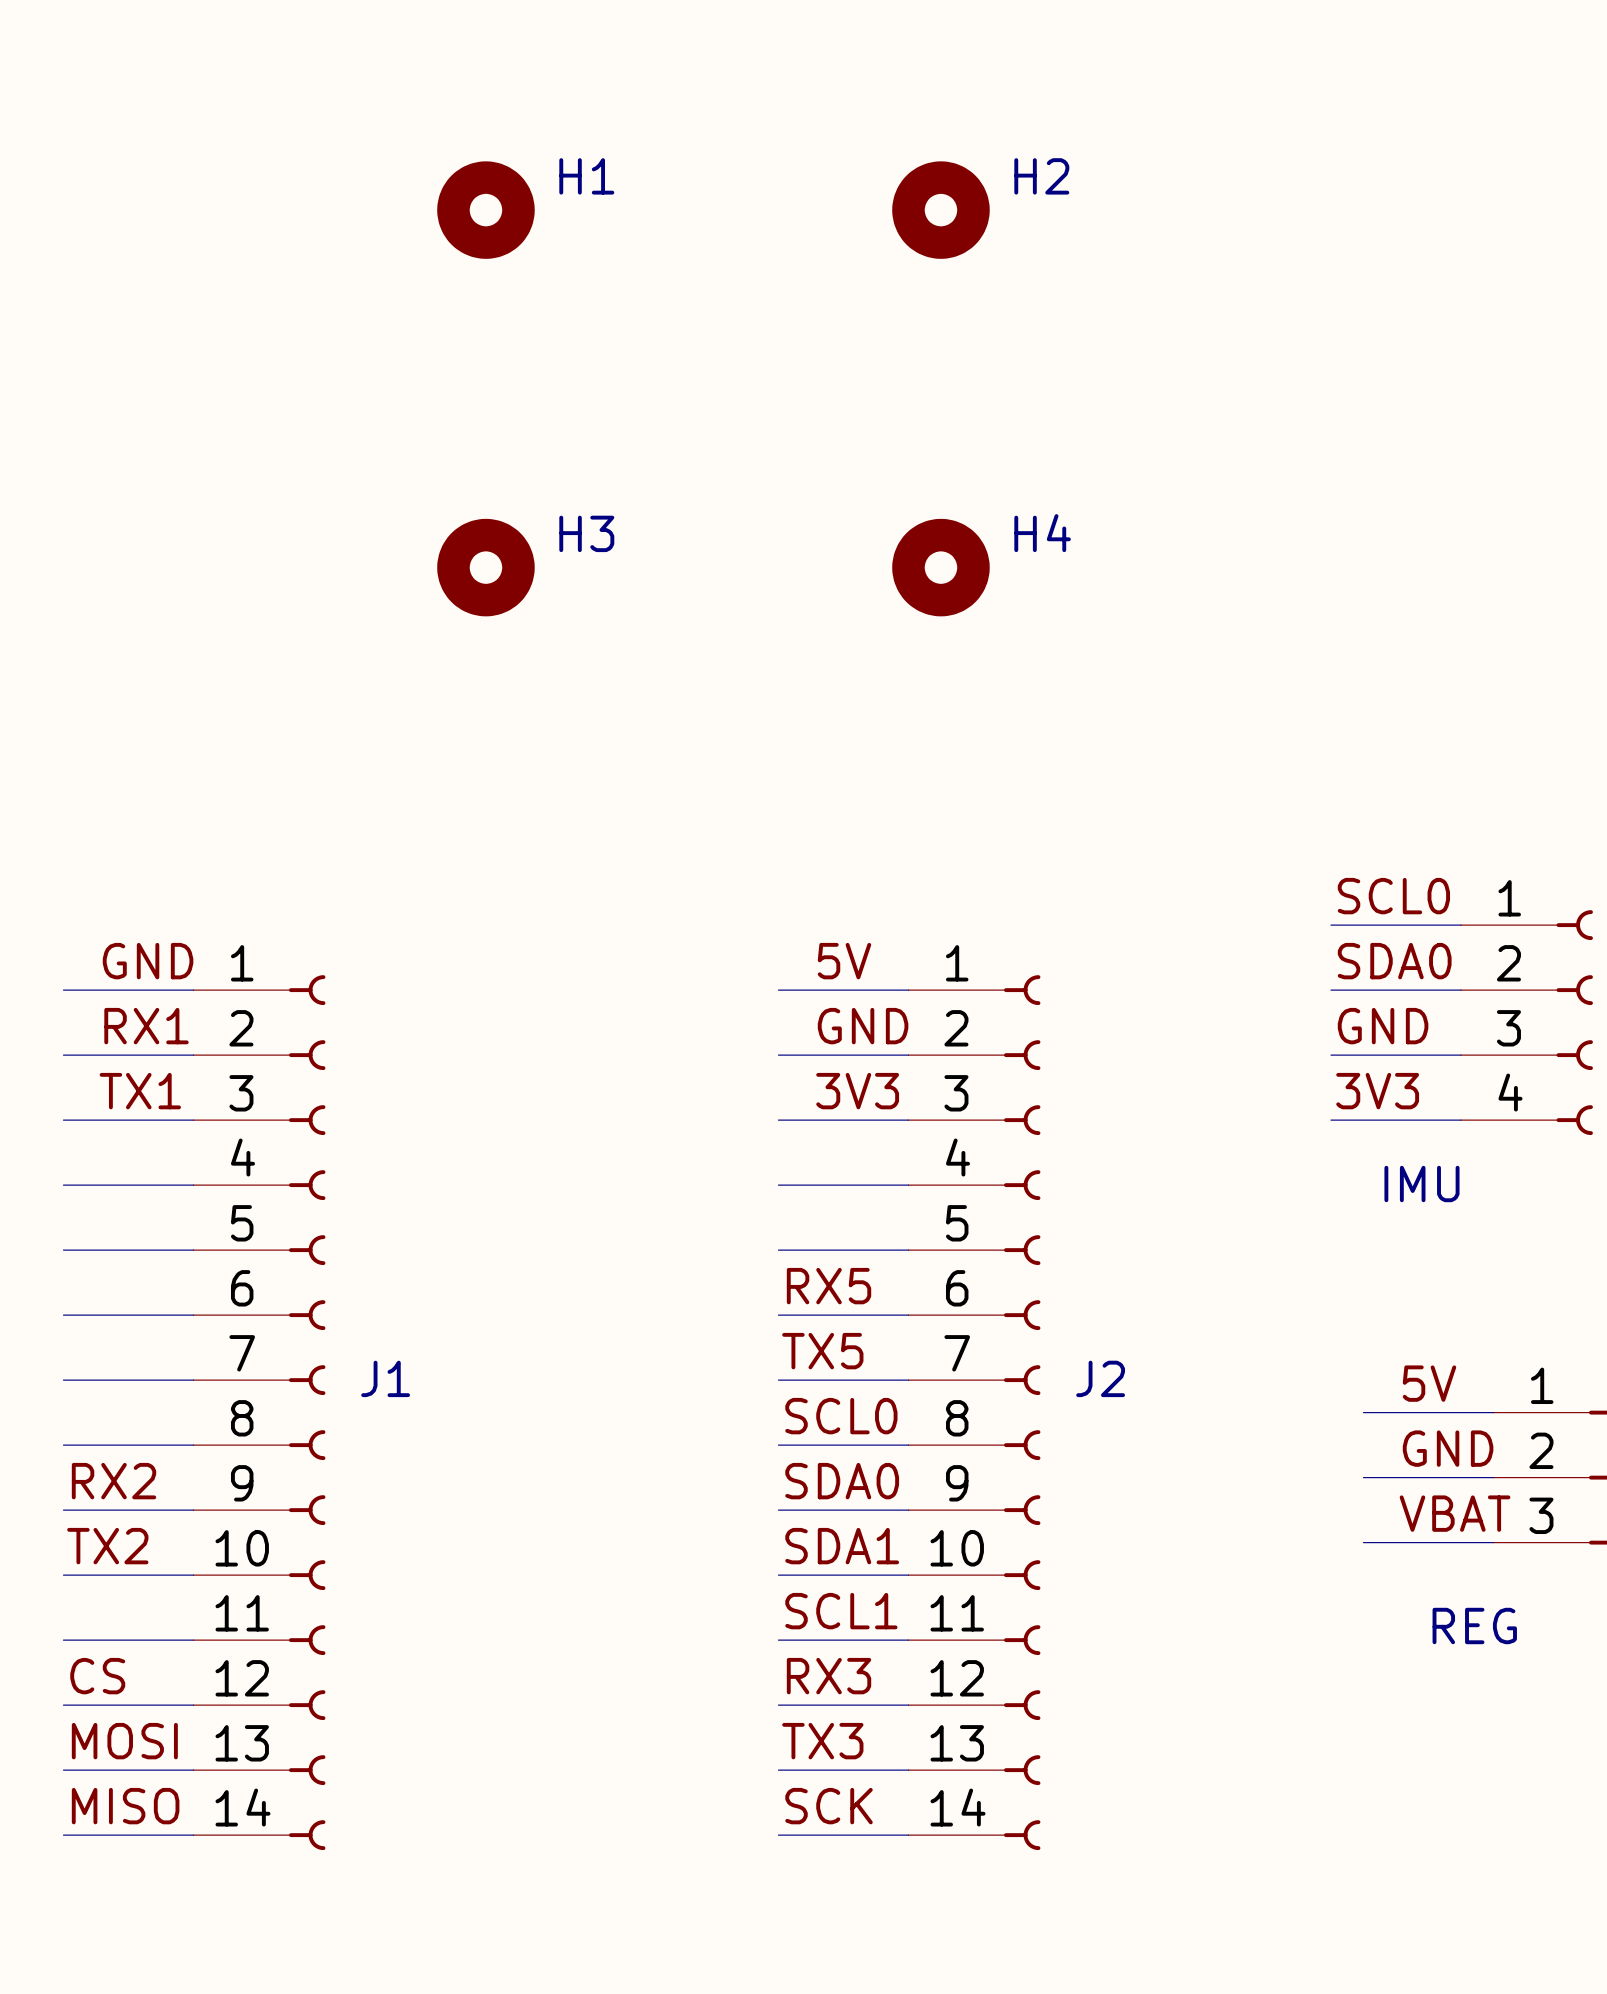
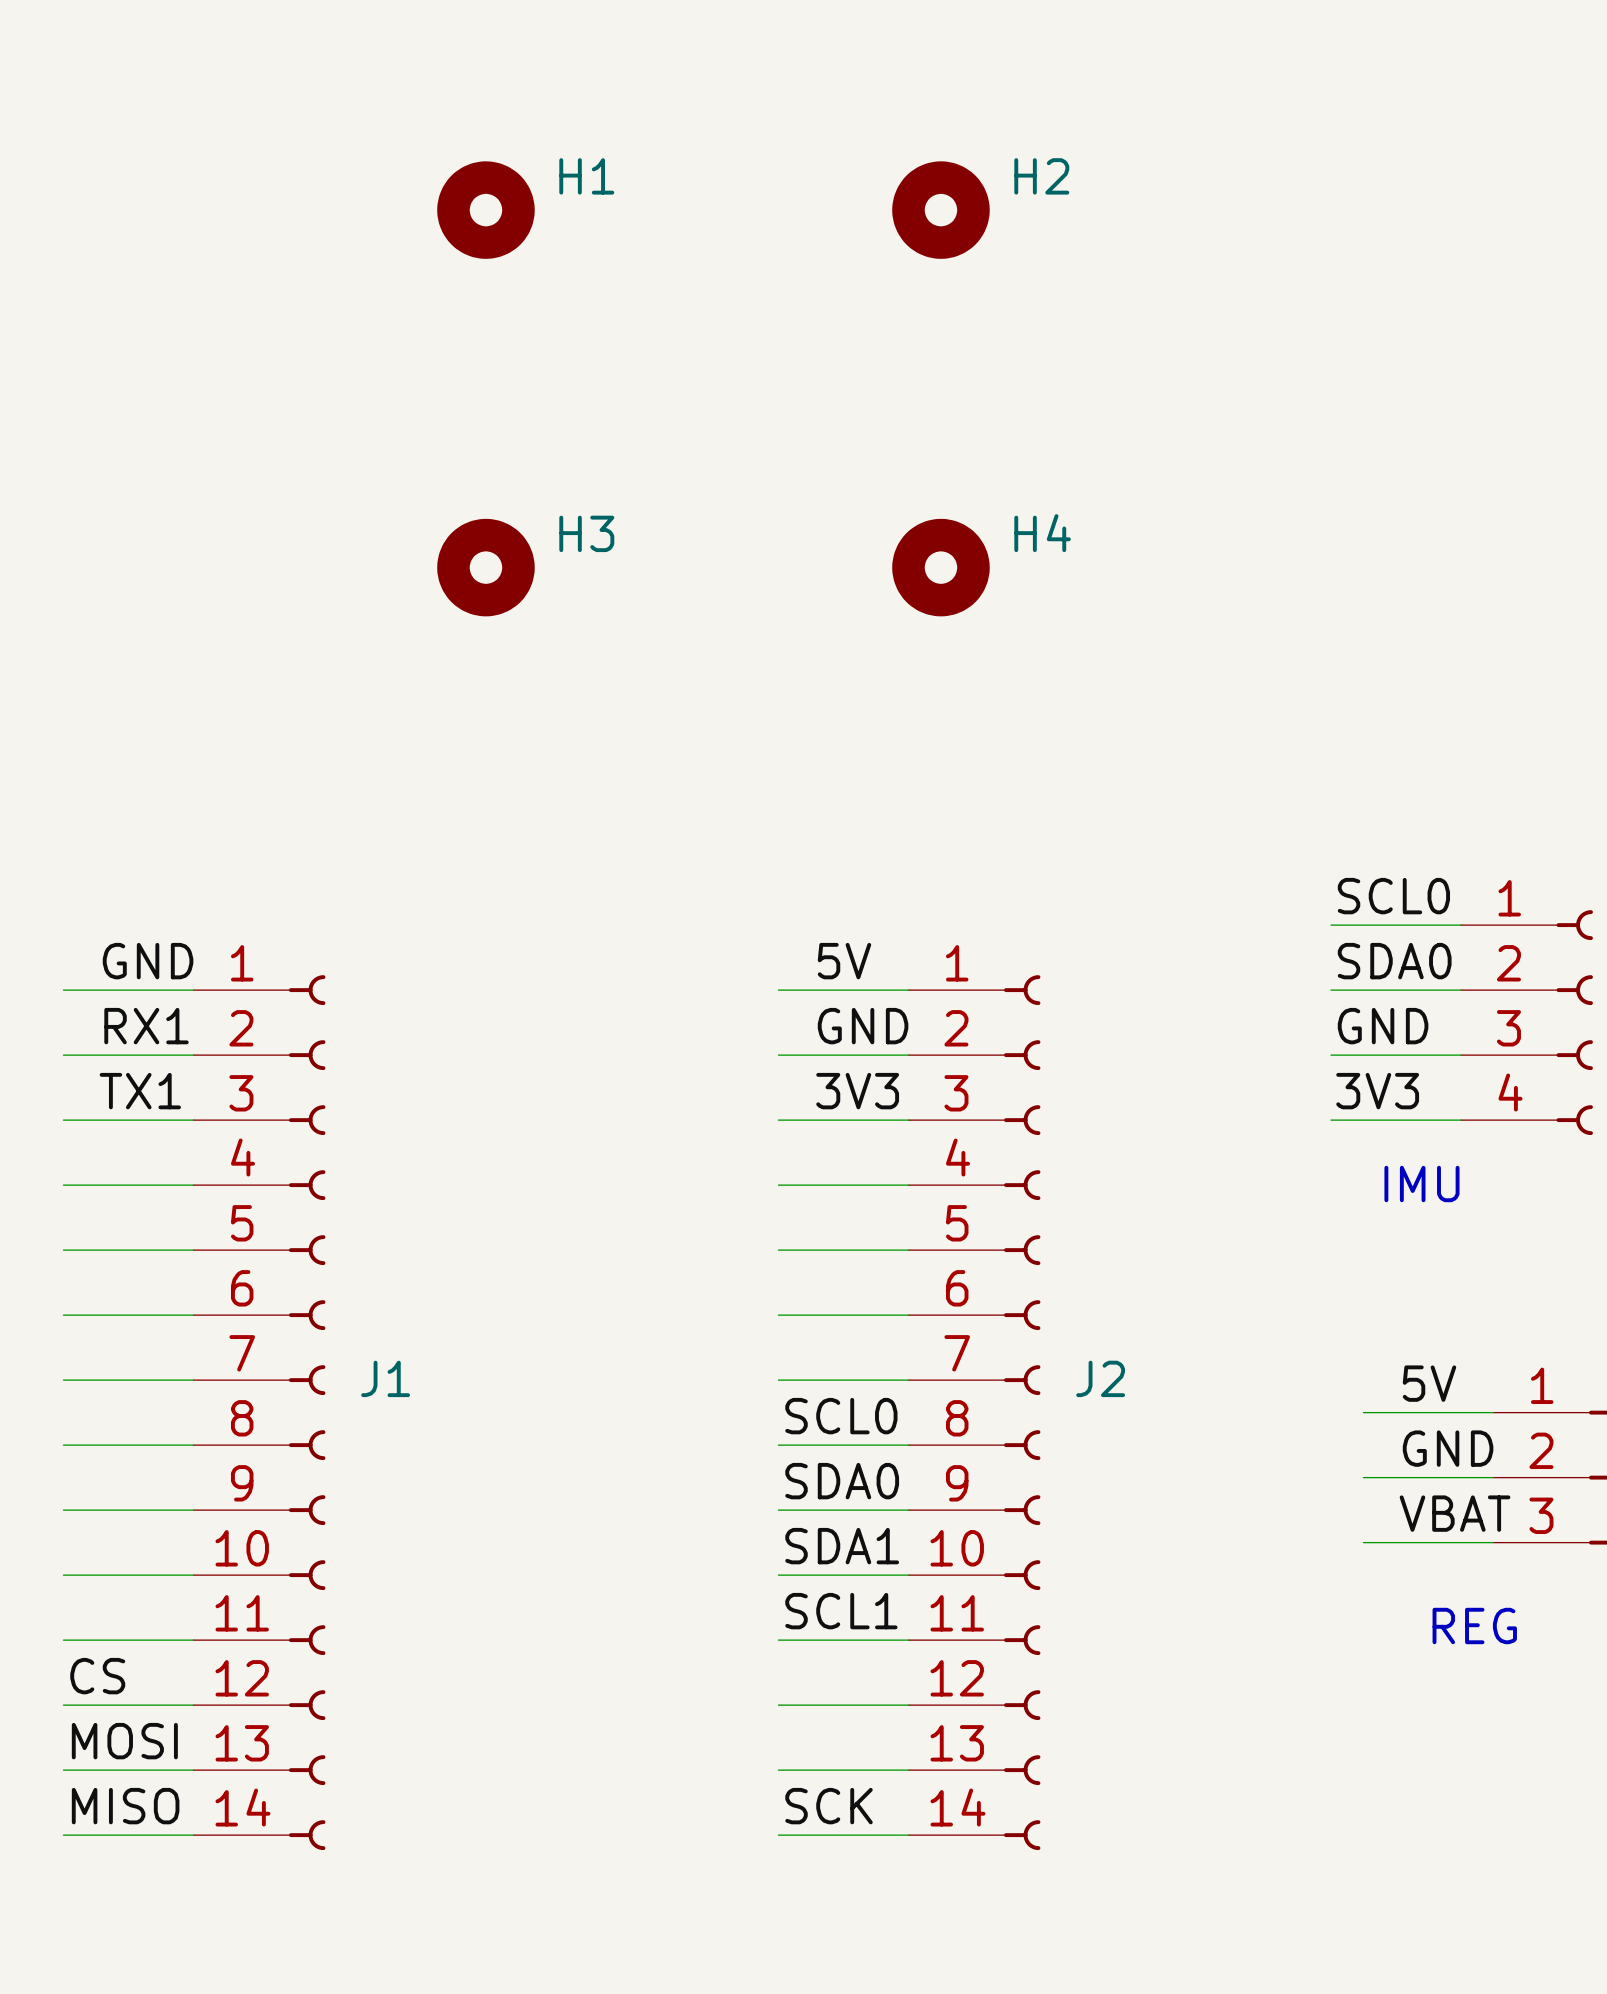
label: RX5 (829, 1286) -> none
label: TX5 (822, 1351) -> none
label: RX2 (114, 1481) -> none
label: TX2 (107, 1546) -> none
label: RX3 (829, 1676) -> none
label: TX3 (822, 1741) -> none

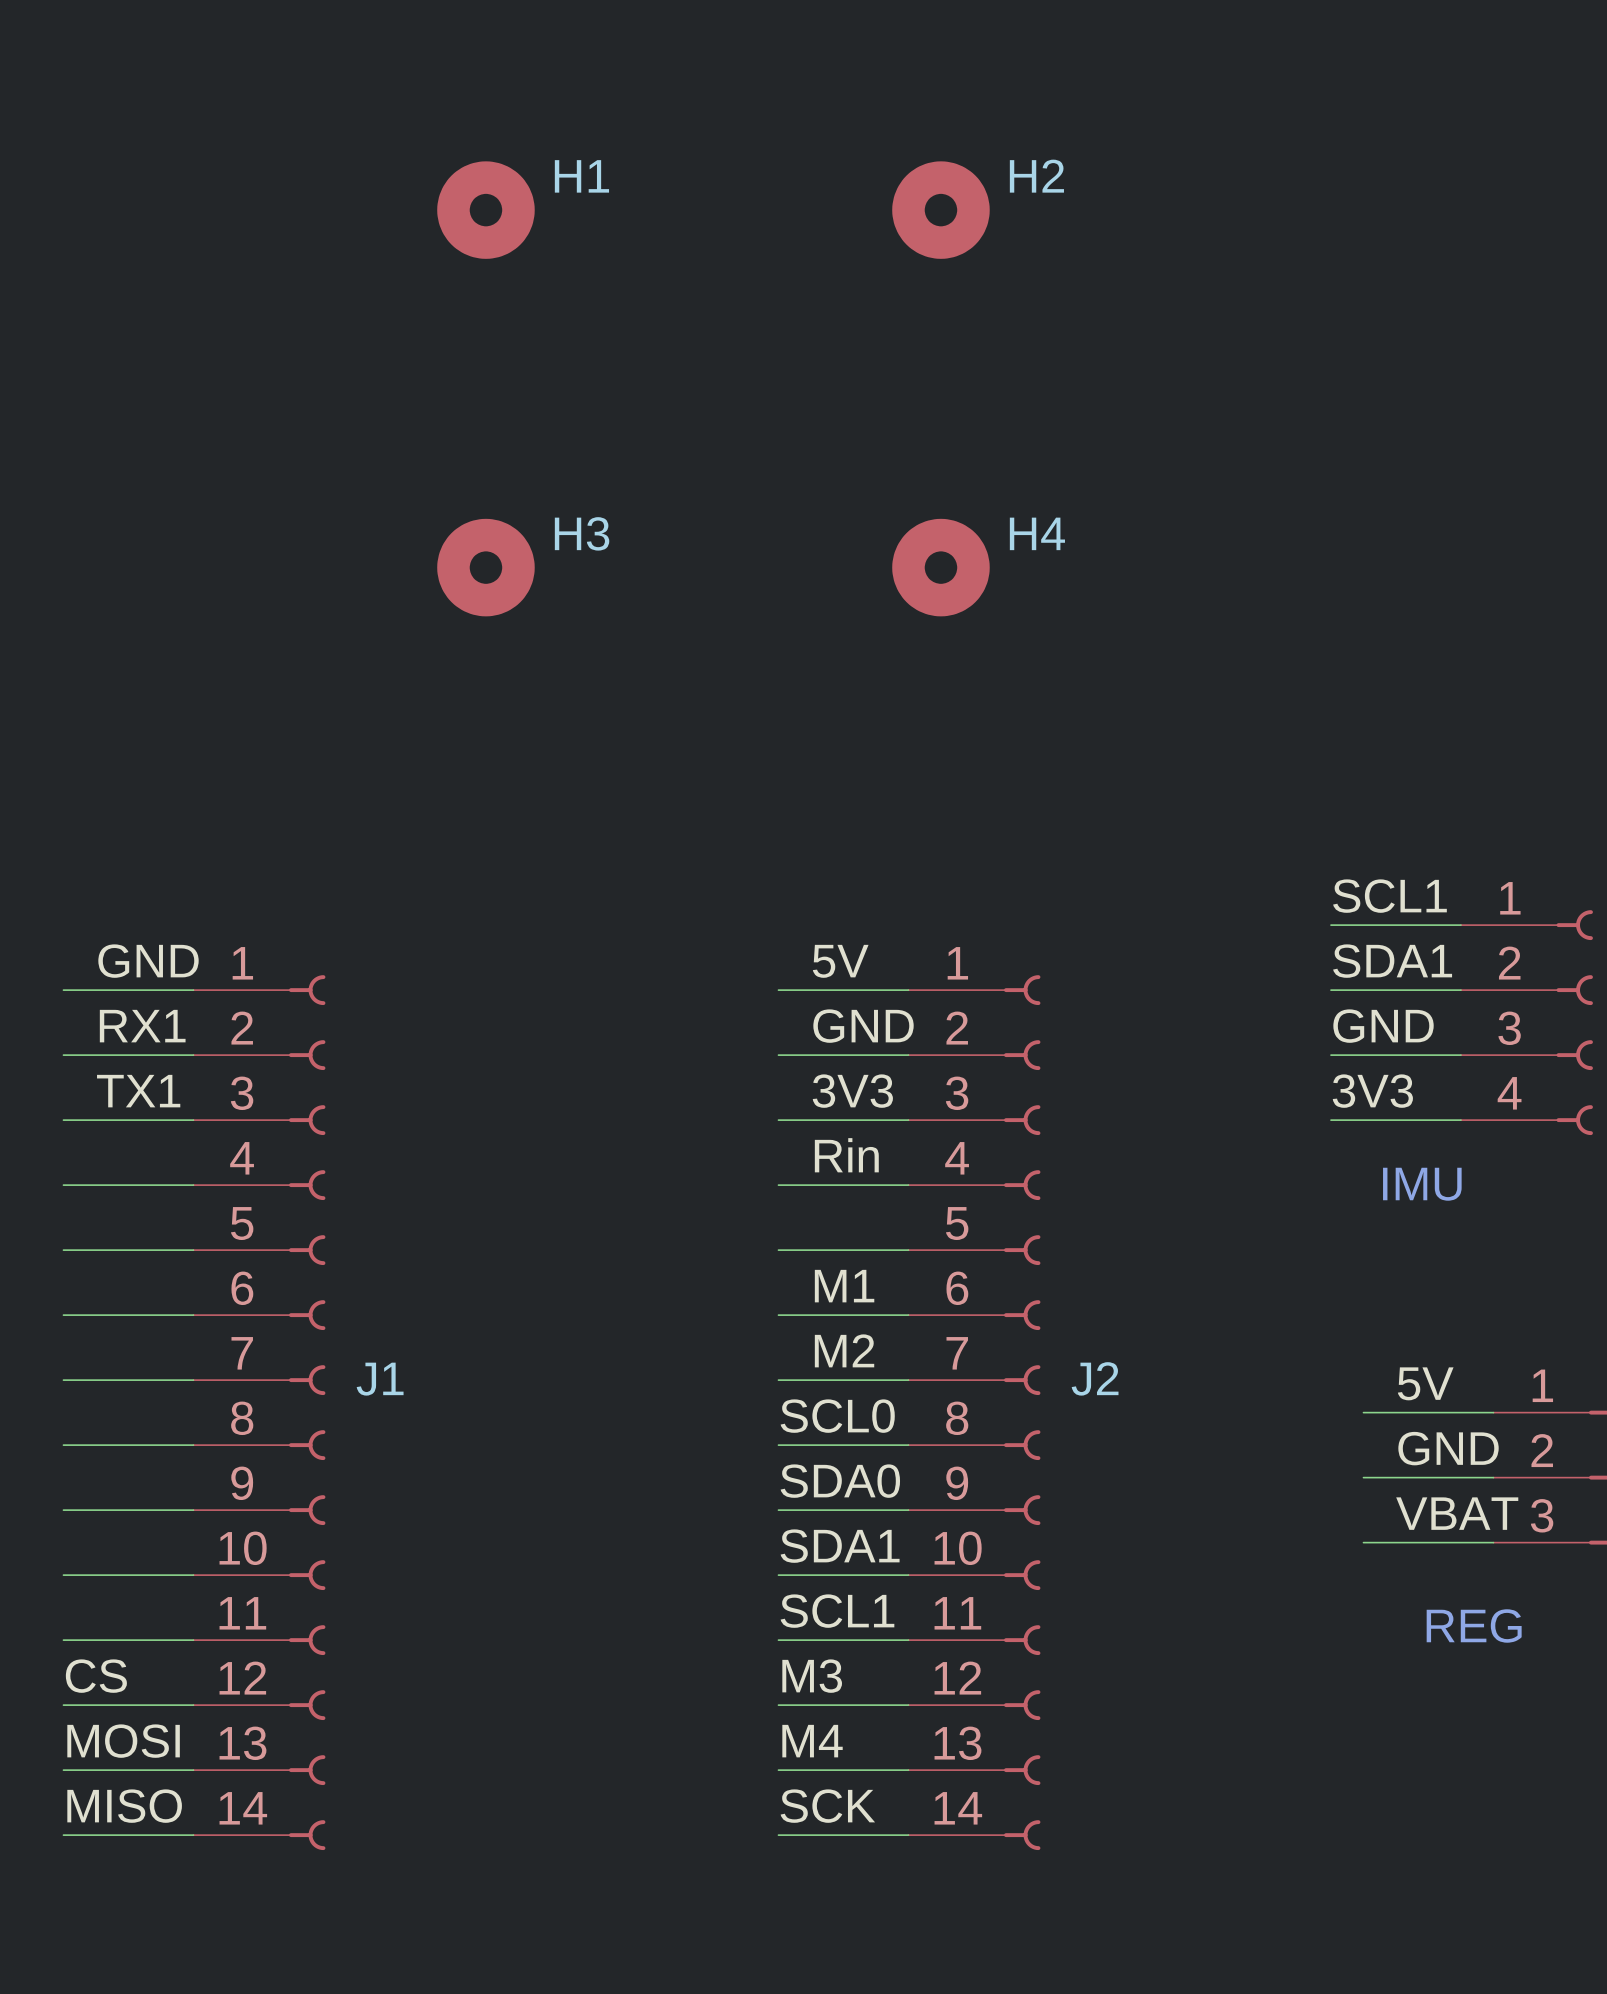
label: SCL0 (1393, 896) -> SCL1 (1389, 896)
label: SDA0 (1394, 961) -> SDA1 (1392, 961)
label: none -> Rin (846, 1155)
label: none -> M1 (844, 1286)
label: none -> M2 (844, 1350)
label: none -> M3 (812, 1676)
label: none -> M4 (812, 1741)

